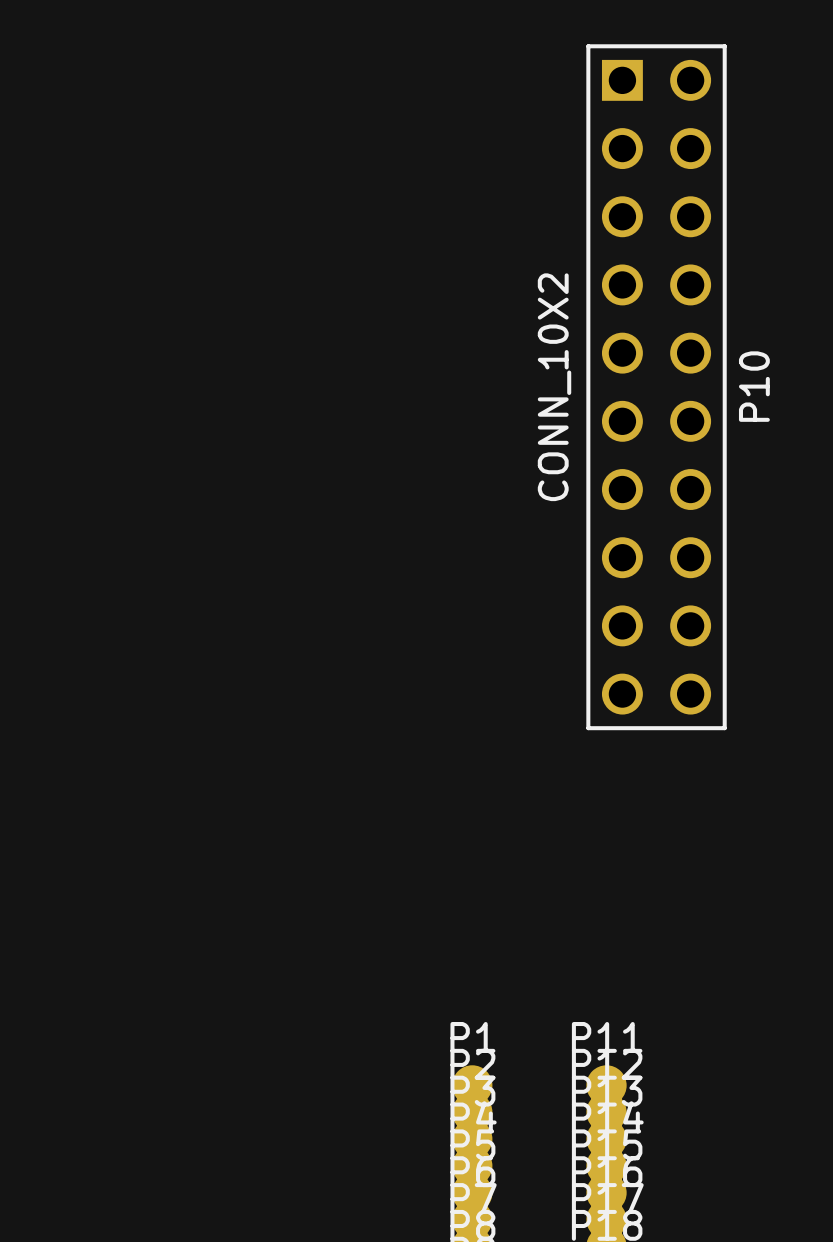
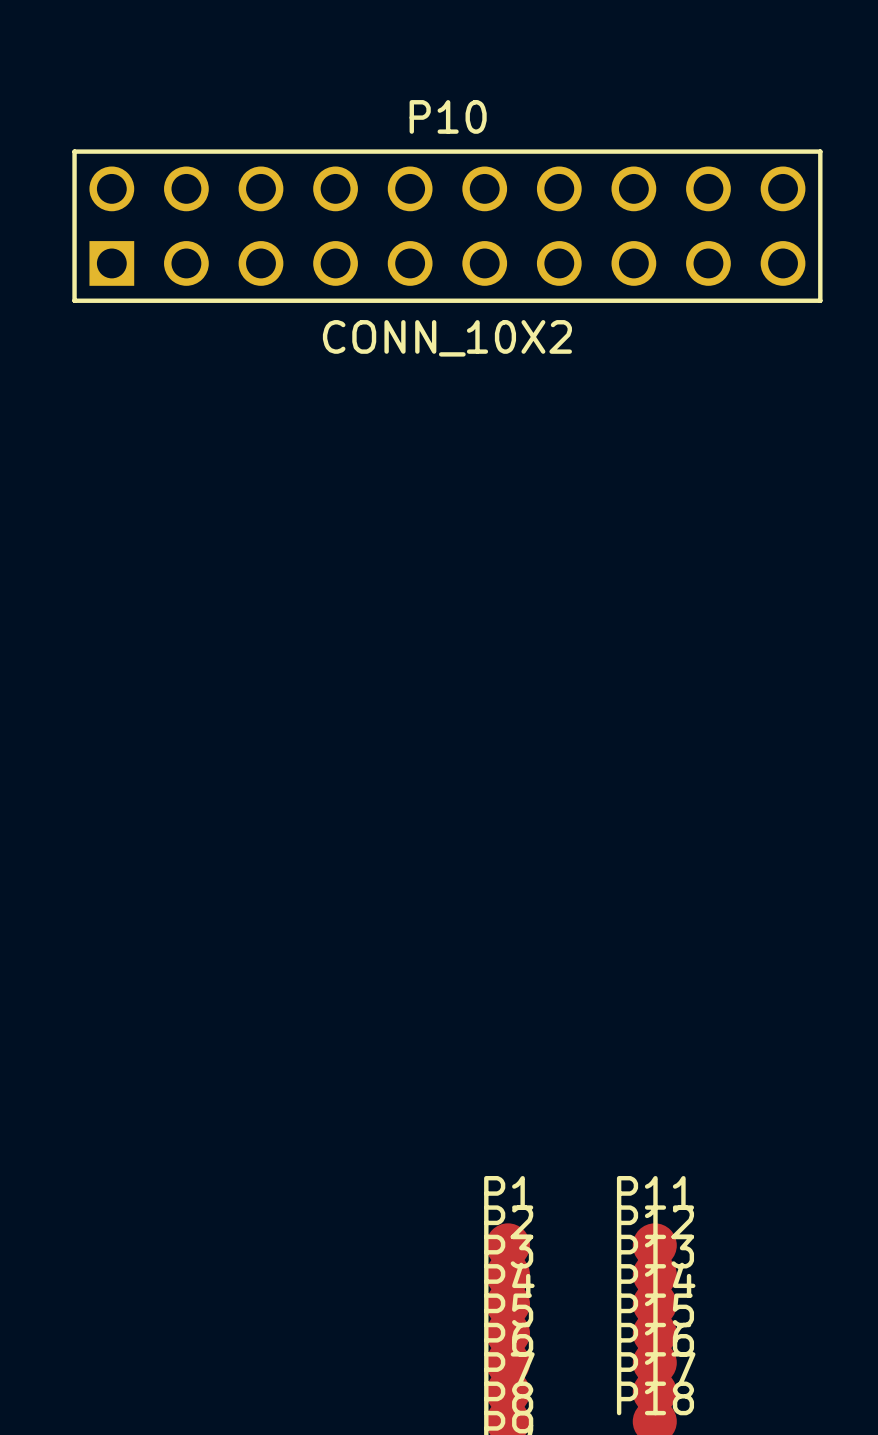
P10 rotation: 0° (656, 387) -> 90° counterclockwise (447, 226)

